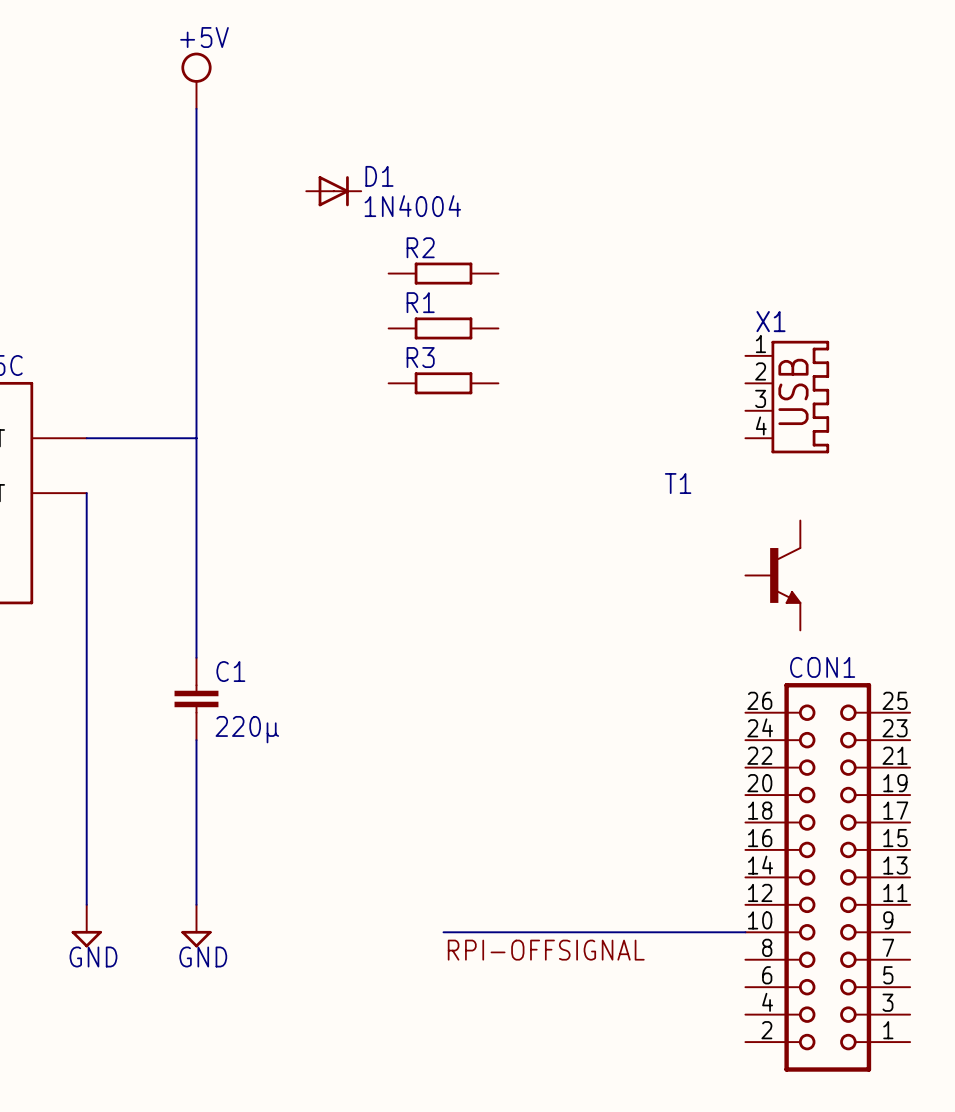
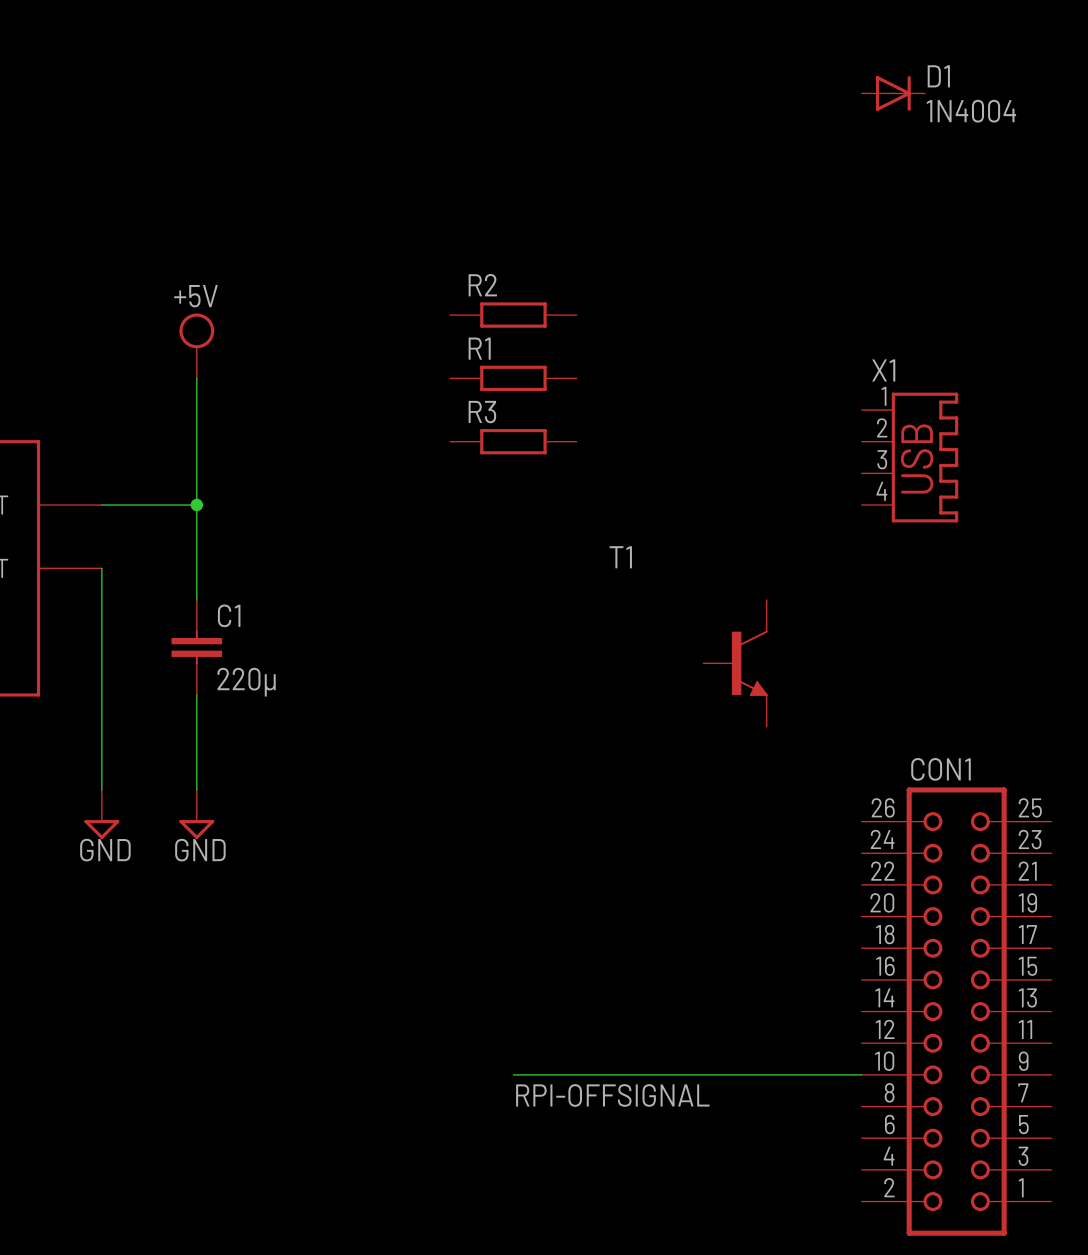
power symbol position: +5V (196, 80) -> +5V (196, 345)
wire: (196, 108) (196, 657) -> none
D1 position: (333, 191) -> (893, 93)
wire: none -> (196, 378) (196, 599)
wire: (169, 438) (196, 438) -> none
junction: none -> (196, 505)
T1 position: (773, 575) -> (735, 663)
wire: none -> (196, 694) (196, 789)
wire: (86, 685) (86, 904) -> none
C1 position: (196, 698) -> (196, 647)
power symbol: none -> GND (101, 814)
power symbol: none -> GND (196, 814)
wire: (196, 740) (196, 904) -> none
power symbol: GND (86, 926) -> none
power symbol: GND (196, 926) -> none

